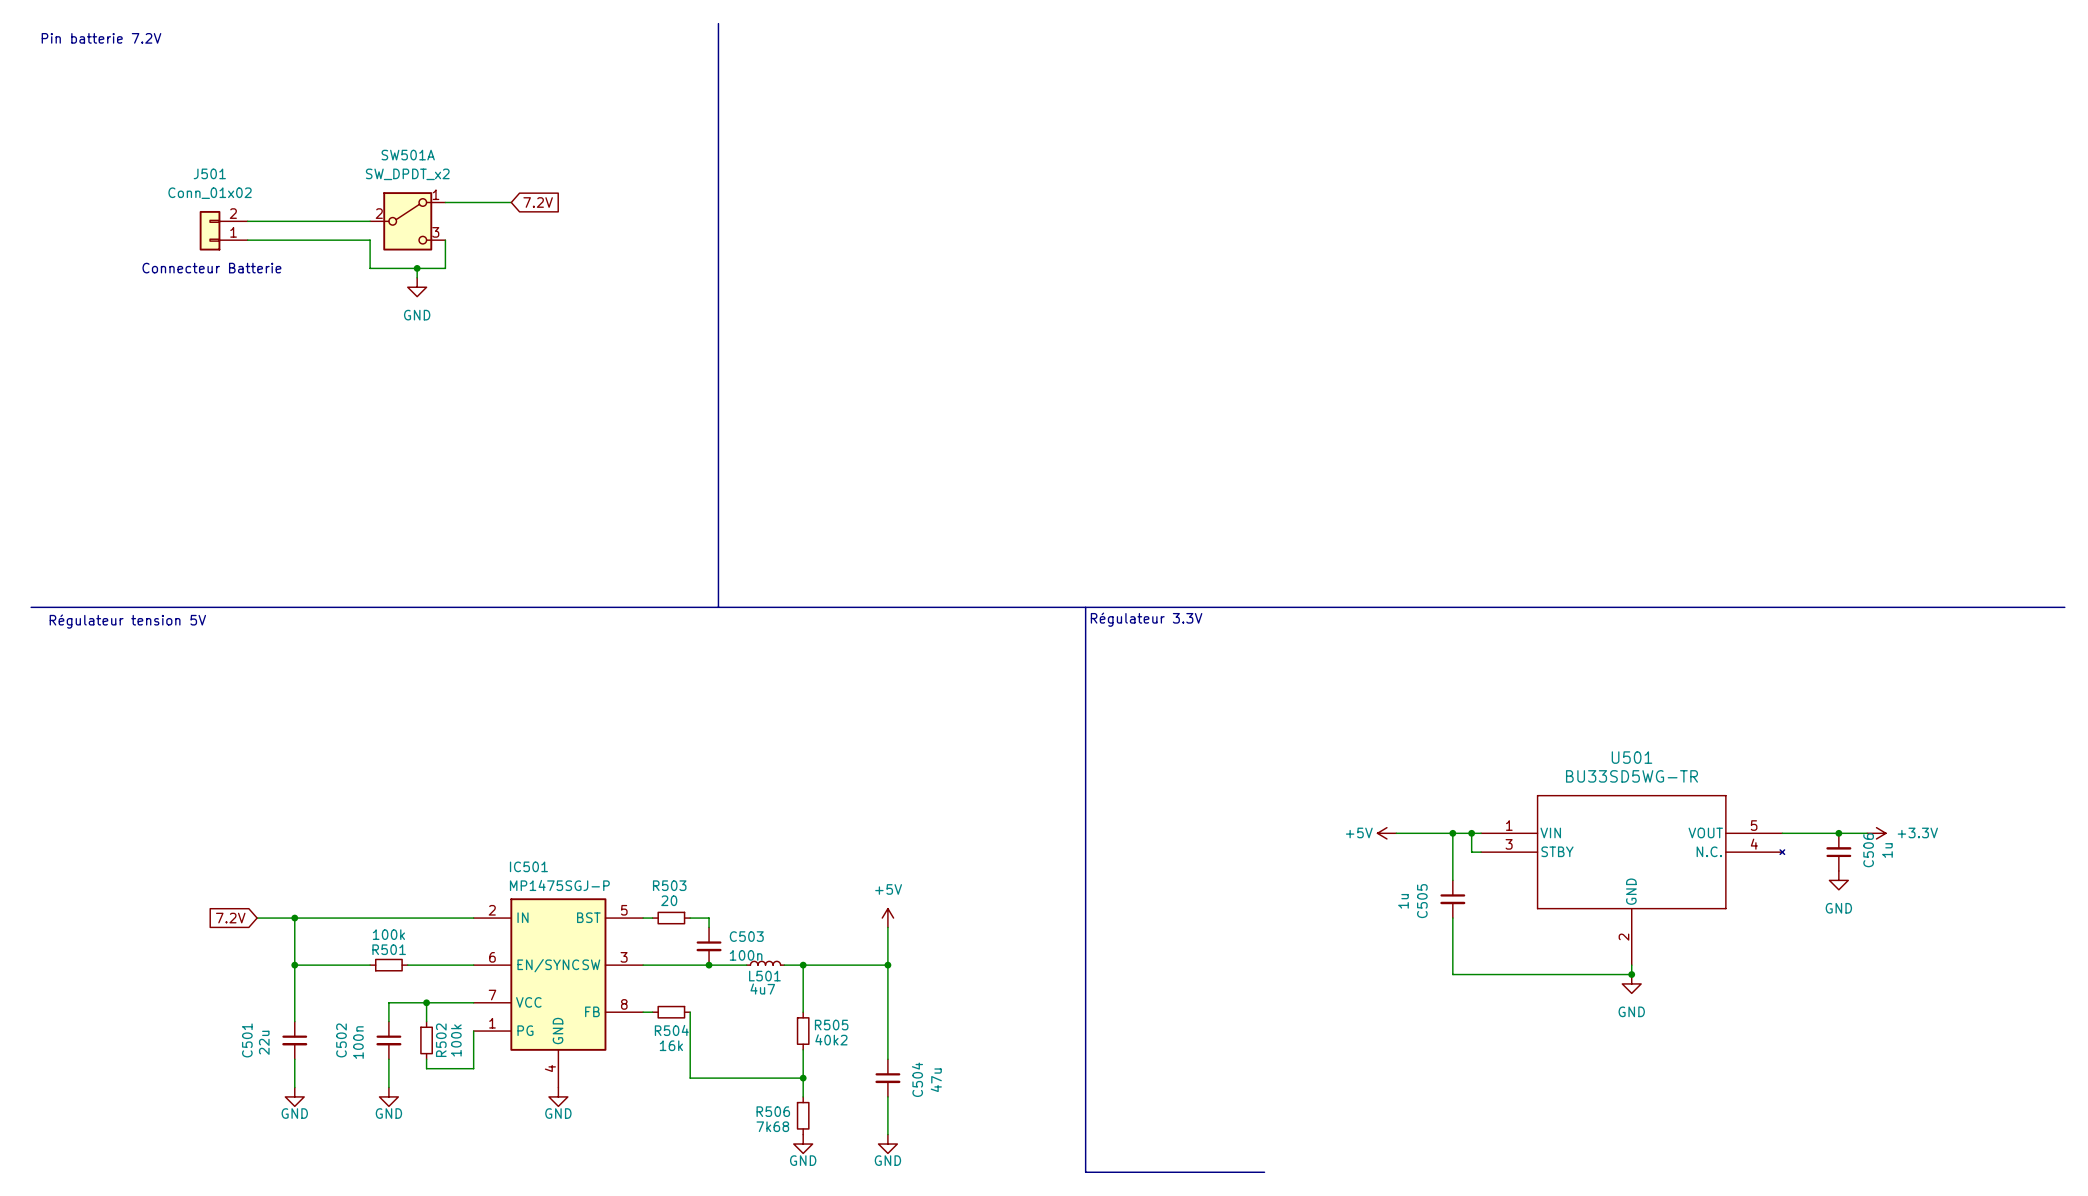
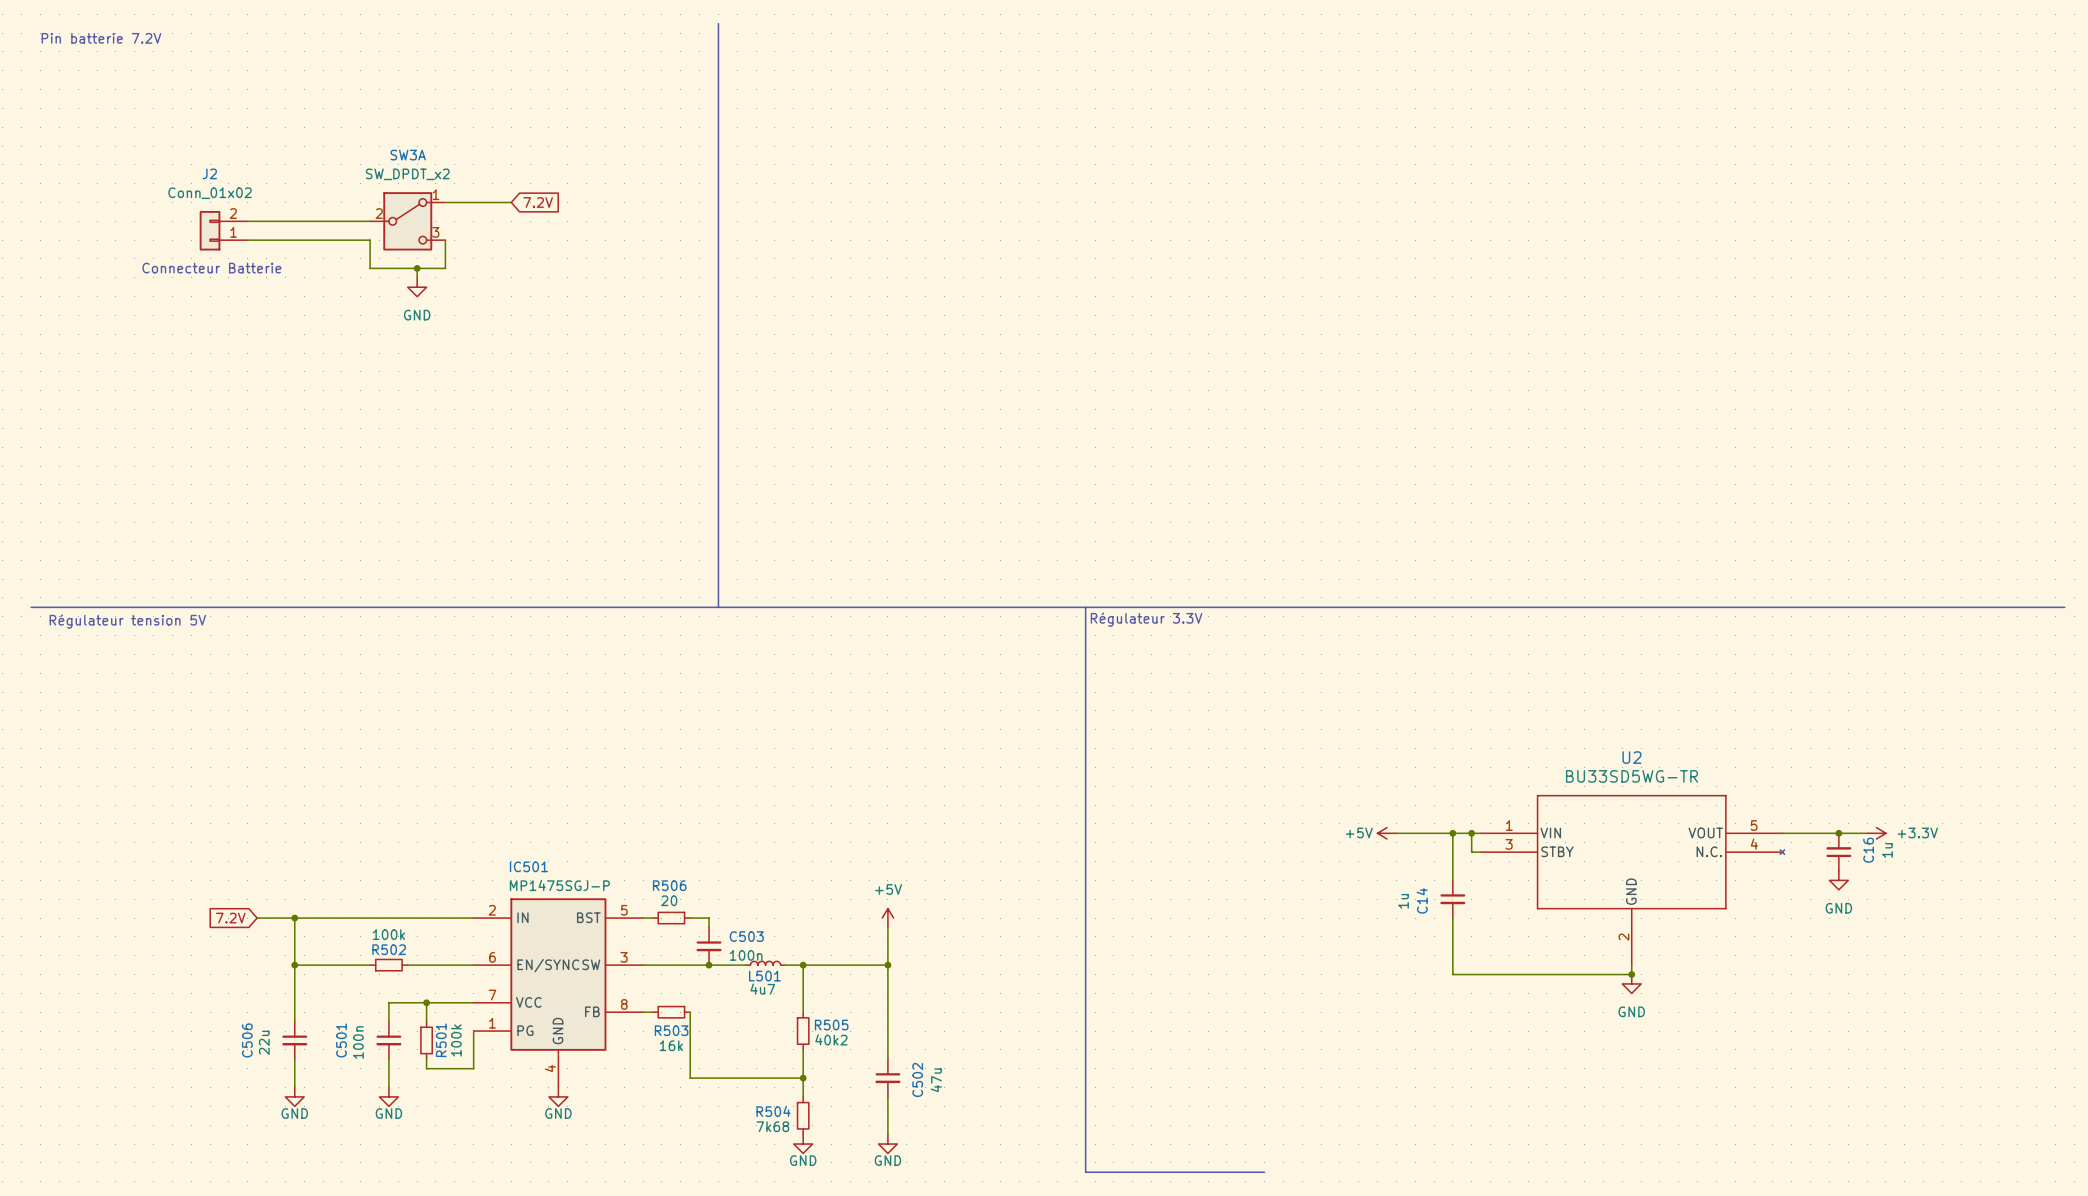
SW501A name: SW501A (408, 155) -> SW3A (408, 155)
J501 name: J501 (209, 173) -> J2 (209, 173)
U501 name: U501 (1631, 757) -> U2 (1631, 757)
C506 name: C506 (1868, 850) -> C16 (1868, 850)
R503 name: R503 (669, 885) -> R506 (669, 885)
C505 name: C505 (1422, 901) -> C14 (1422, 900)
R501 name: R501 (389, 949) -> R502 (389, 949)
R504 name: R504 (671, 1030) -> R503 (671, 1030)
C501 name: C501 (247, 1040) -> C506 (247, 1040)
C502 name: C502 (341, 1040) -> C501 (341, 1040)
R502 name: R502 (441, 1040) -> R501 (441, 1040)
C504 name: C504 (917, 1079) -> C502 (917, 1079)
R506 name: R506 (773, 1111) -> R504 (773, 1111)

